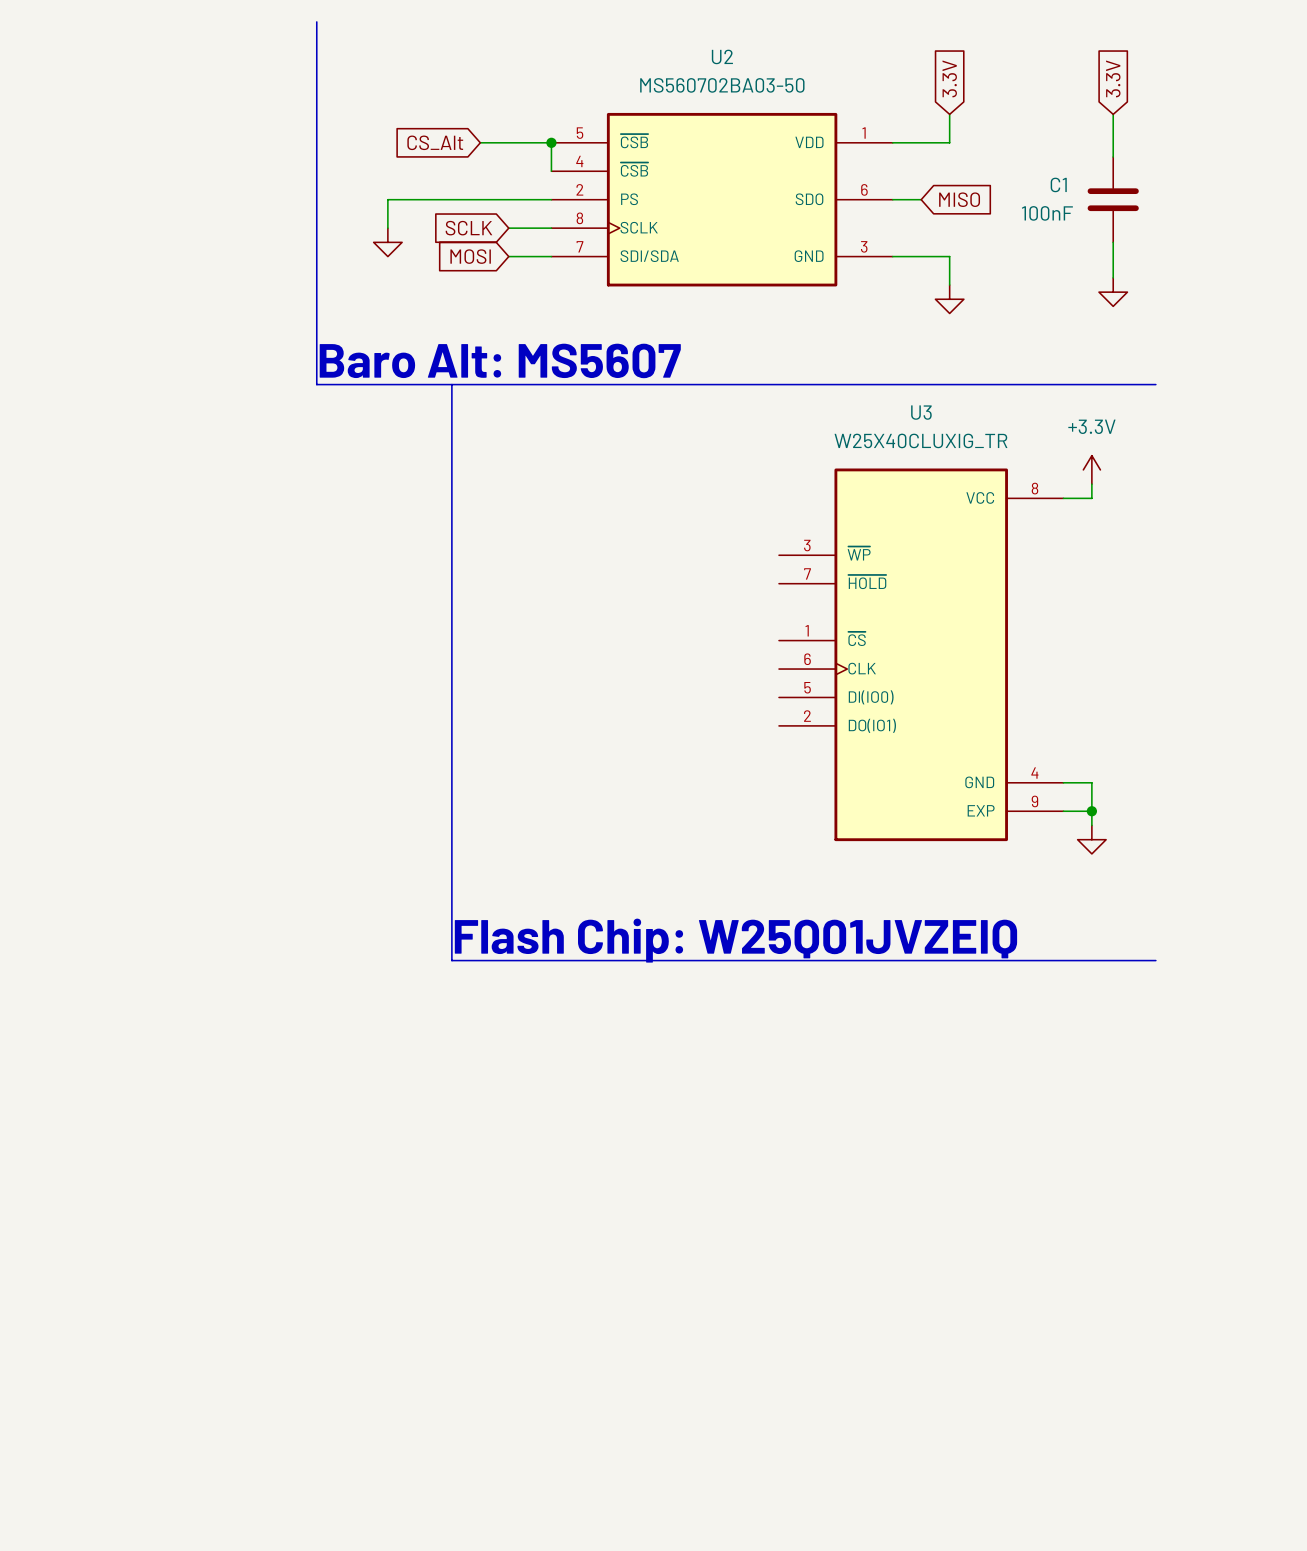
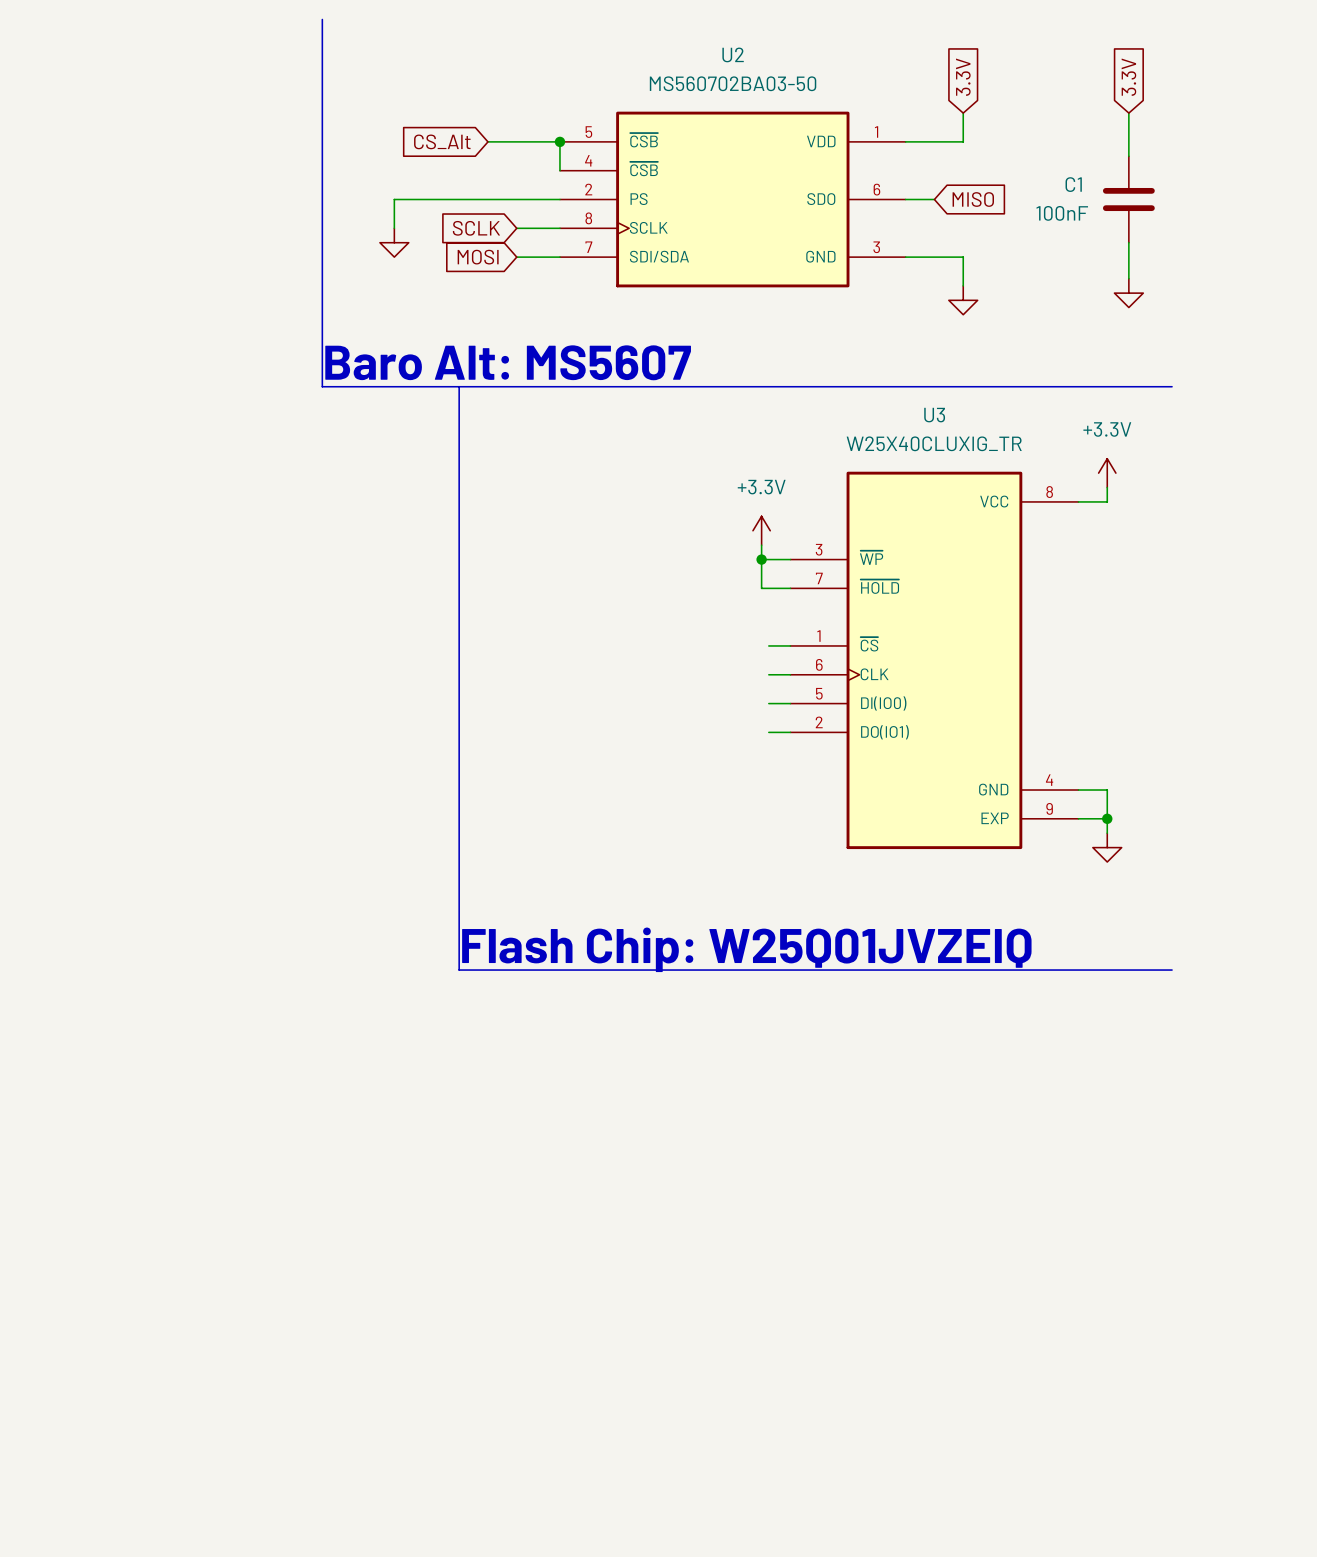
power symbol: none -> +3.3V (761, 530)
wire: none -> (761, 545) (761, 588) (790, 588)
wire: none -> (761, 559) (790, 559)
junction: none -> (761, 559)
wire: none -> (768, 645) (790, 645)
wire: none -> (768, 674) (790, 674)
wire: none -> (768, 703) (790, 703)
wire: none -> (768, 732) (790, 732)

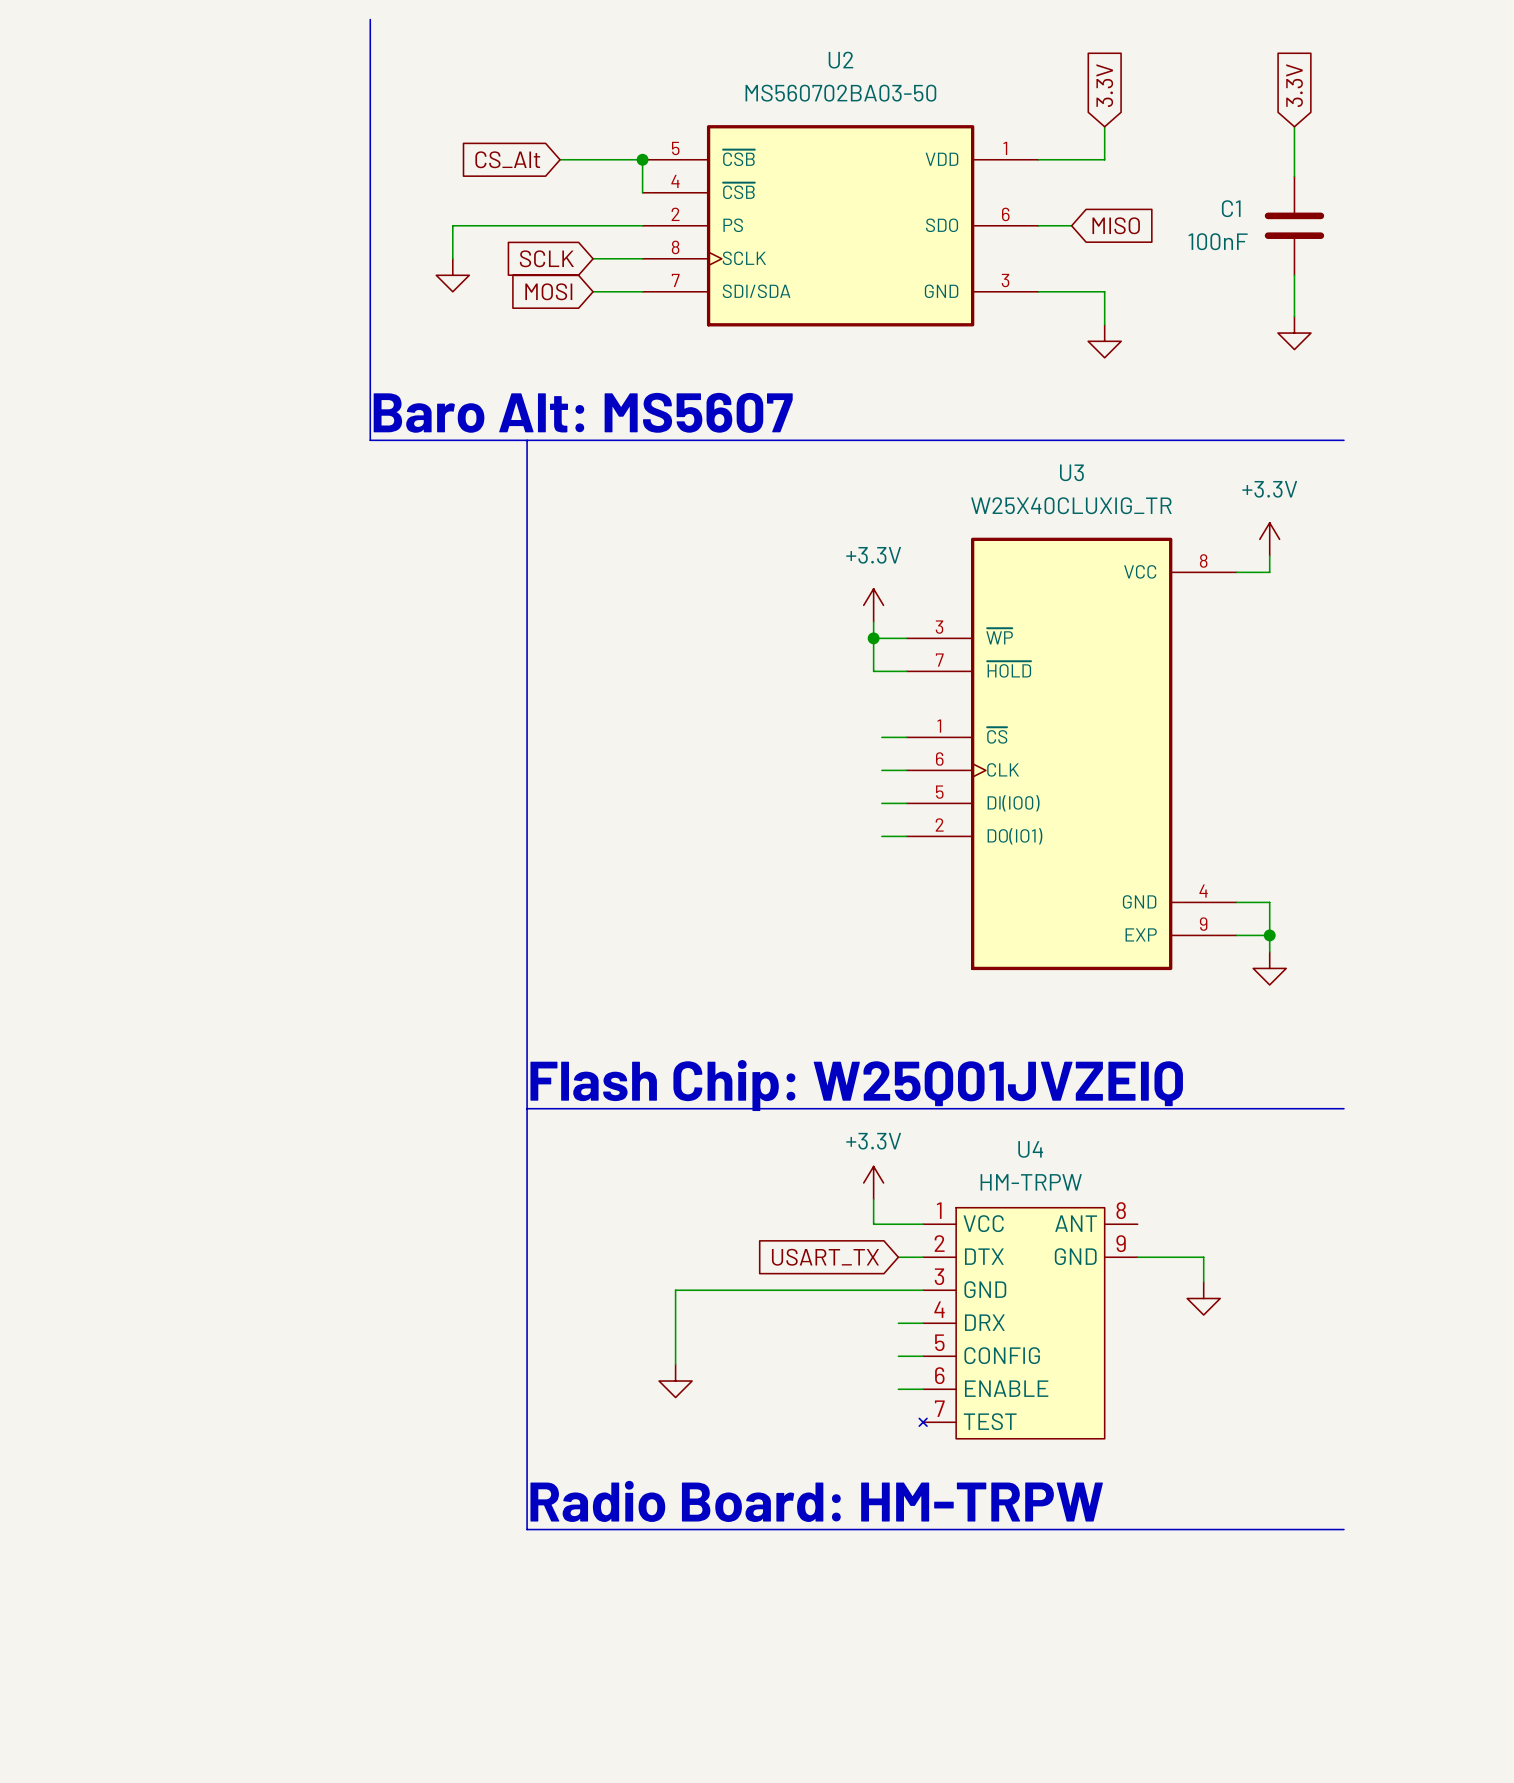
line: none -> (527, 1108) (527, 1529) (1343, 1529)
power symbol: none -> +3.3V (873, 1182)
wire: none -> (873, 1199) (873, 1224) (923, 1224)
global label: none -> USART_TX (825, 1257)
wire: none -> (898, 1257) (923, 1257)
wire: none -> (1137, 1257) (1203, 1257) (1203, 1282)
wire: none -> (923, 1290) (675, 1290) (675, 1364)
power symbol: none -> (1203, 1298)
wire: none -> (898, 1323) (923, 1323)
U4: none -> HM-TRPW (1028, 1323)
wire: none -> (898, 1356) (923, 1356)
power symbol: none -> (675, 1381)
wire: none -> (898, 1389) (923, 1389)
text: none -> Radio Board: HM-TRPW (816, 1501)

